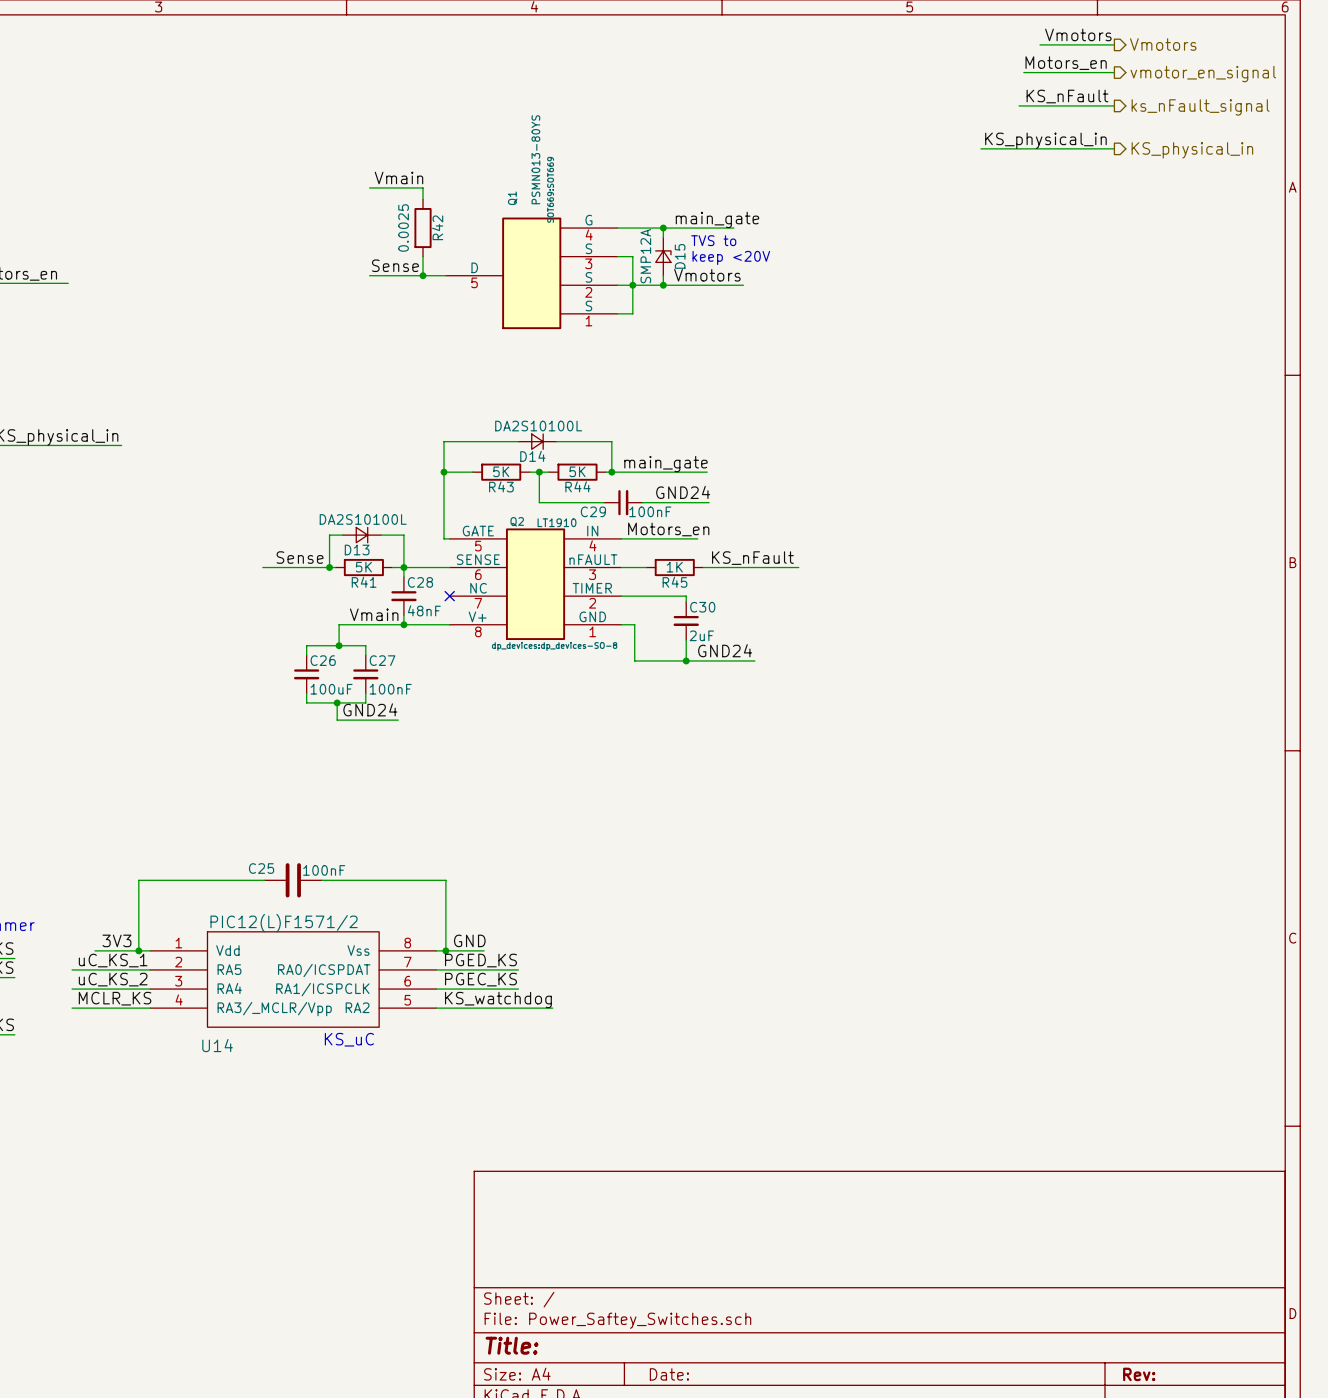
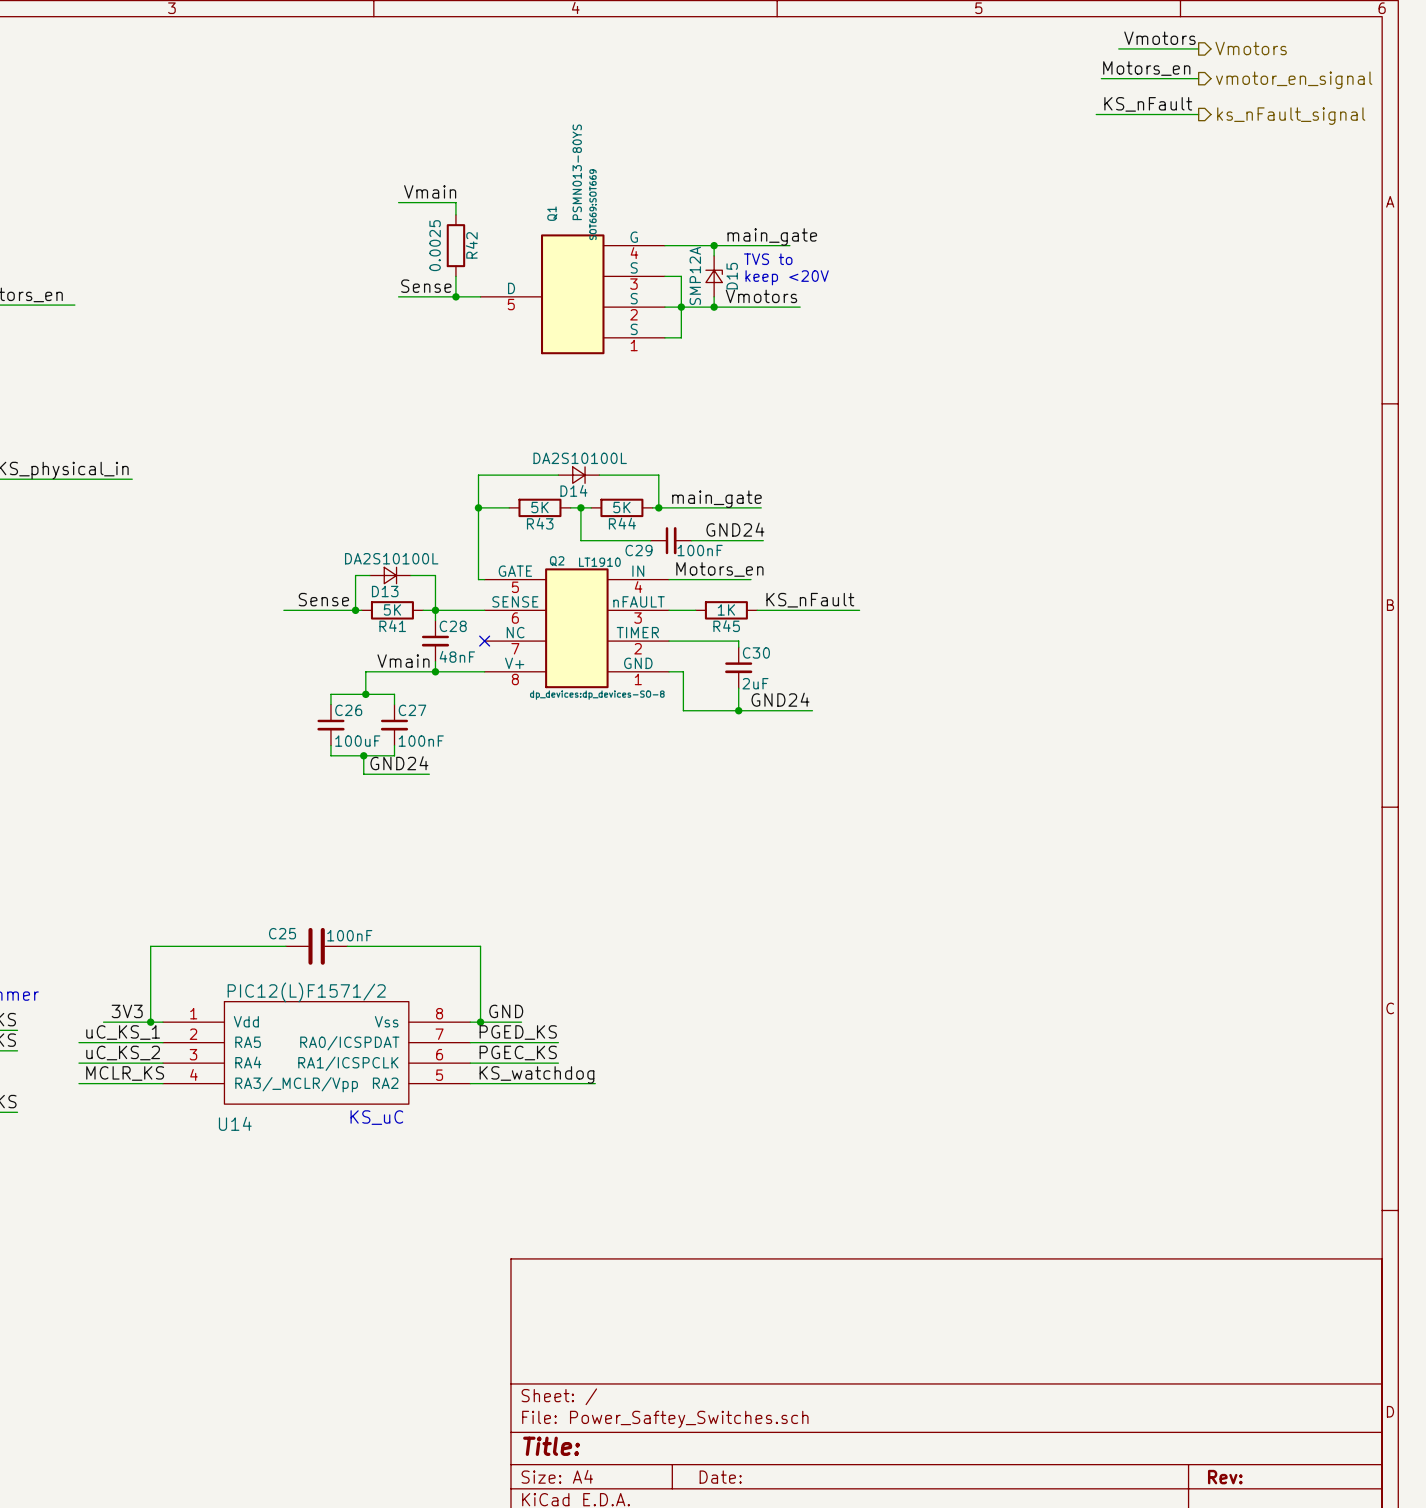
label: KS_physical_in (1045, 140) -> none
wire: (980, 148) (1114, 148) -> none
hierarchical label: KS_physical_in (1192, 150) -> none

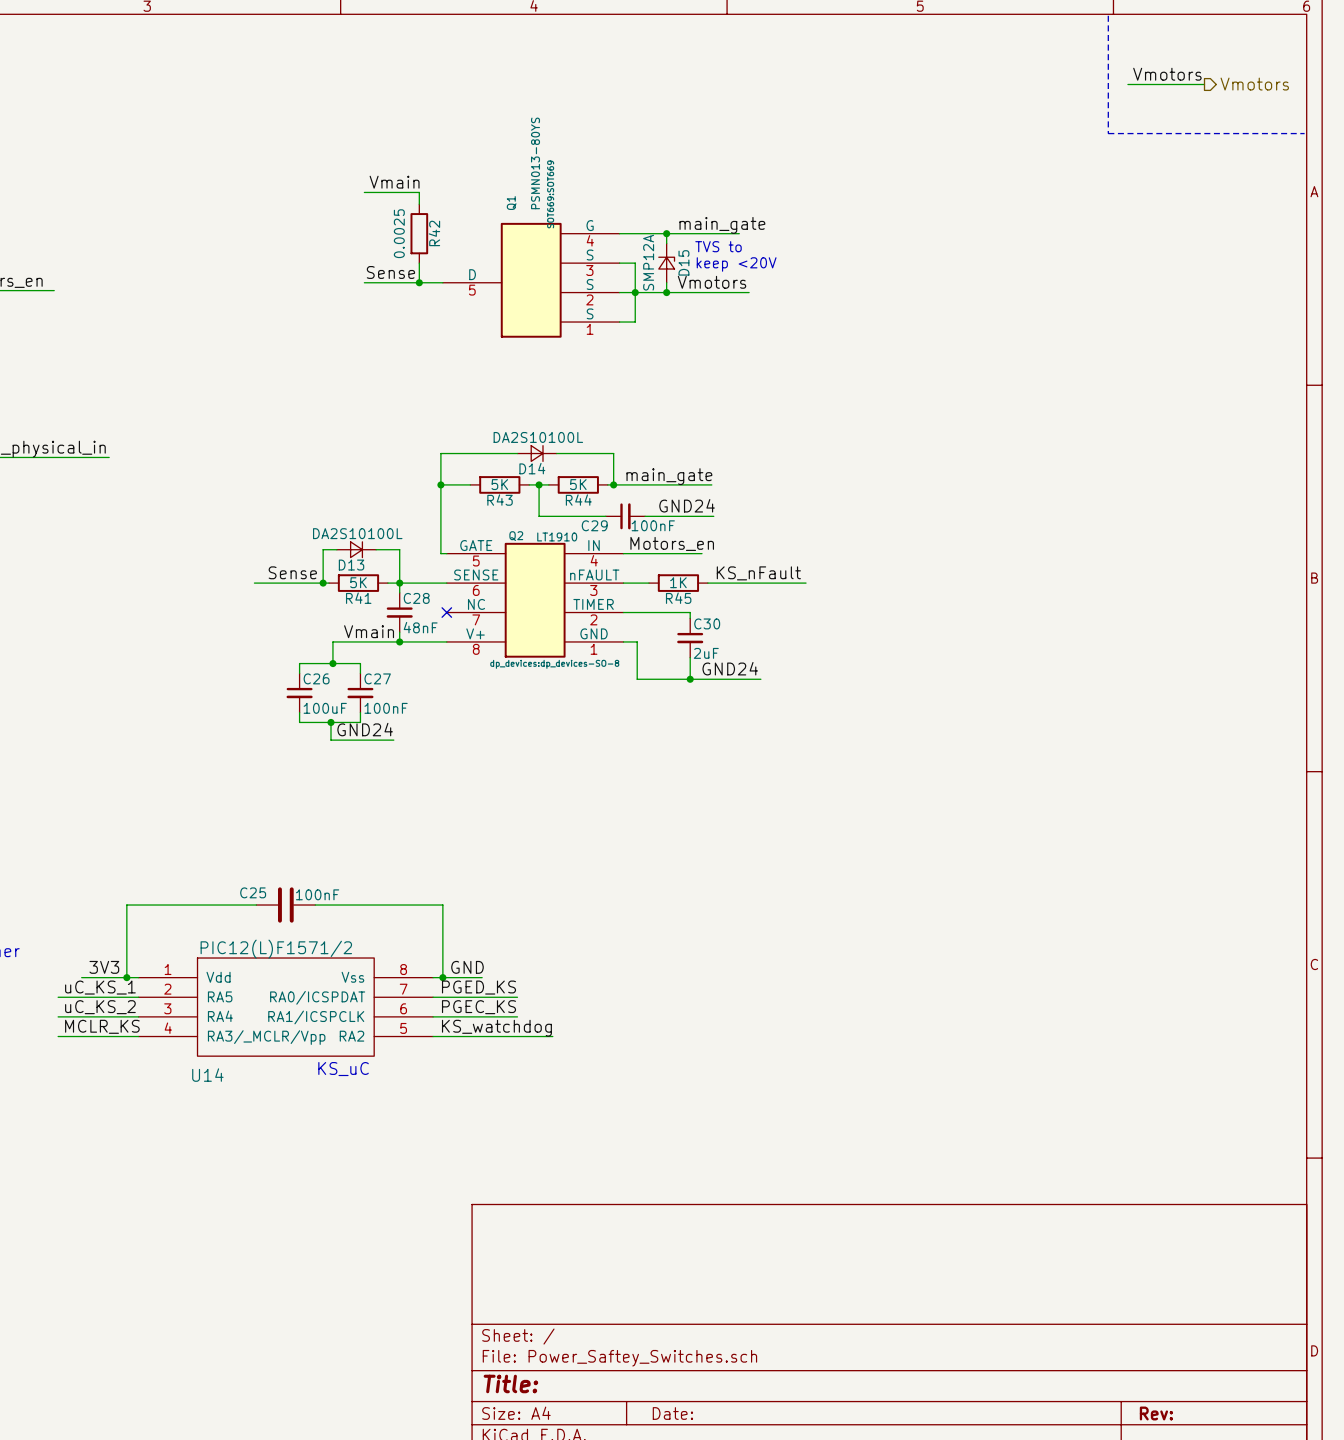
line: none -> (1108, 15) (1108, 133) (1304, 133)
label position: Vmotors (1159, 38) -> Vmotors (1167, 74)
wire: (1118, 48) (1198, 48) -> (1127, 84) (1204, 84)
hierarchical label position: Vmotors (1251, 48) -> Vmotors (1254, 84)
label: Motors_en (1146, 68) -> none
wire: (1101, 78) (1198, 78) -> none
hierarchical label: vmotor_en_signal (1294, 80) -> none
label: KS_nFault (1148, 104) -> none
wire: (1096, 114) (1198, 114) -> none
hierarchical label: ks_nFault_signal (1291, 116) -> none

